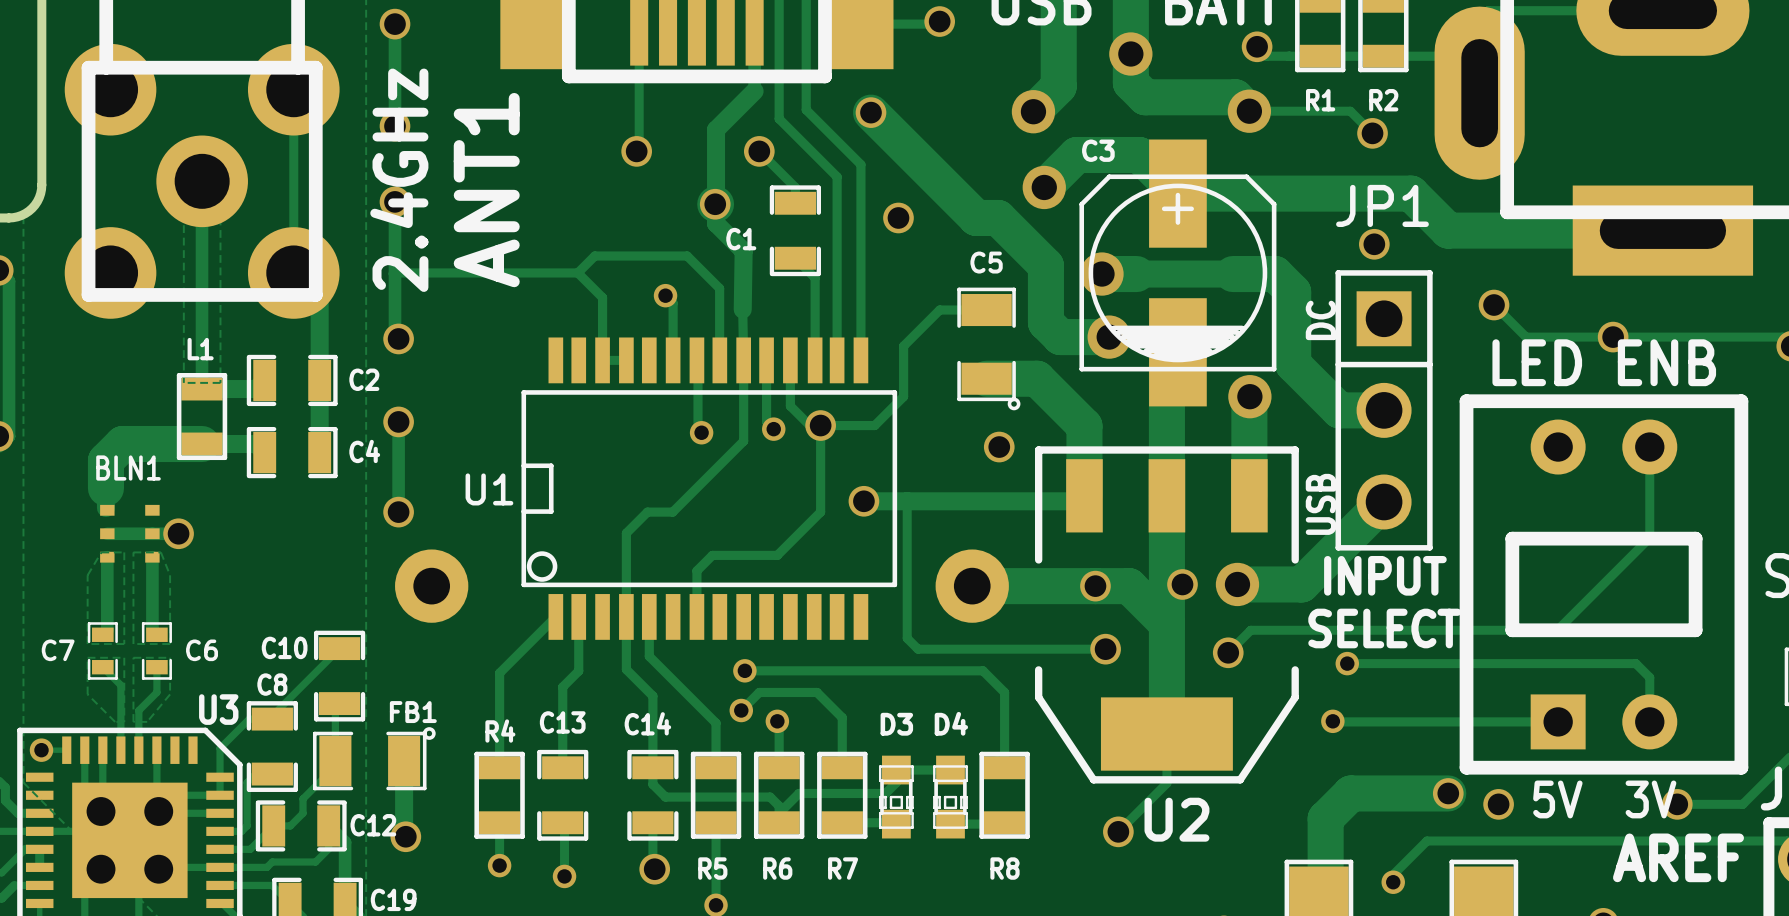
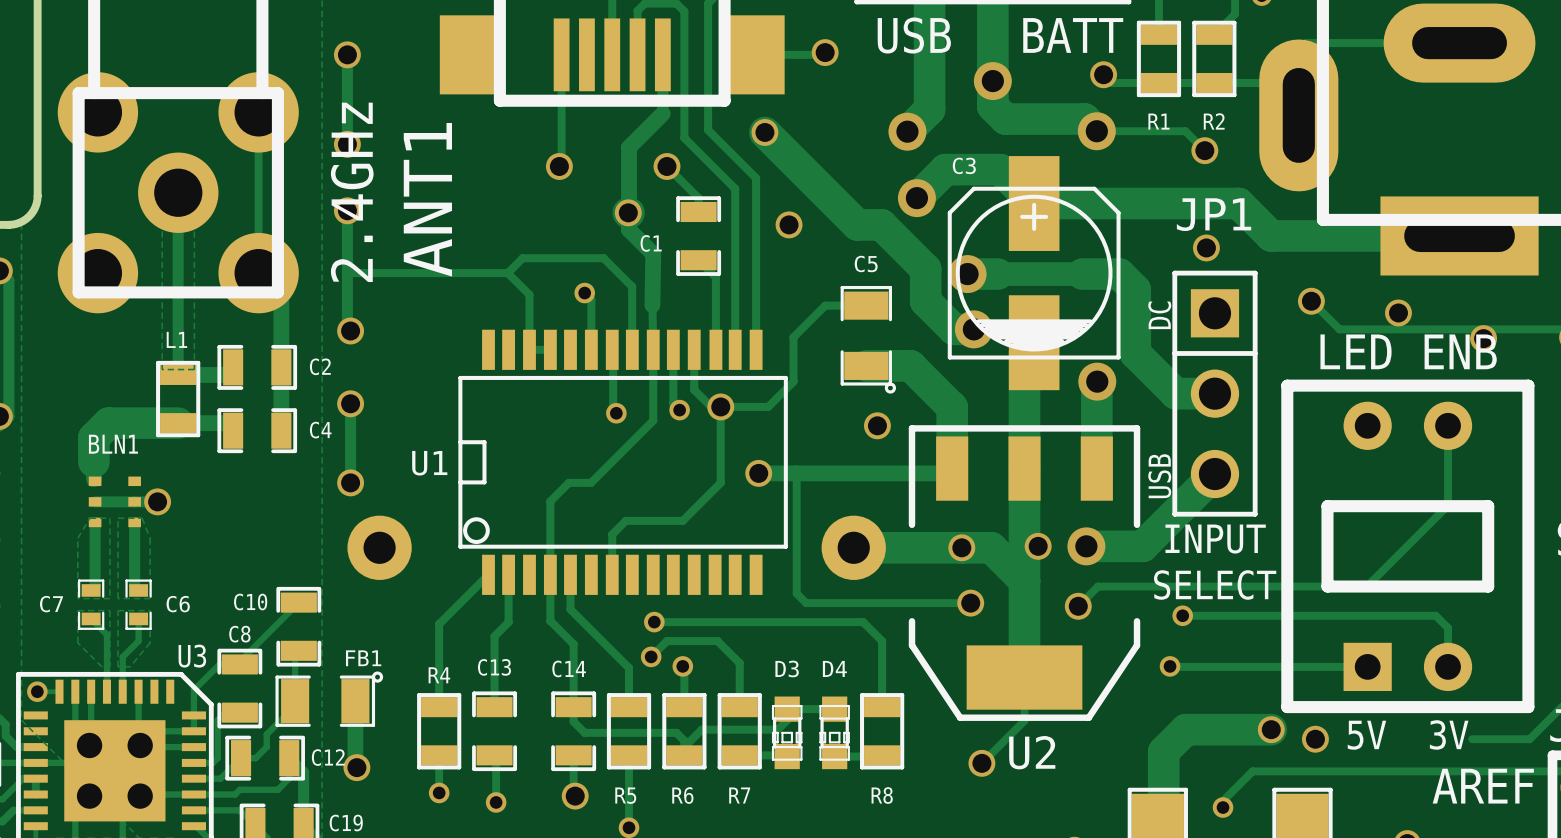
track: (998, 217) (1045, 265) (1045, 322) (1060, 337) (1086, 337) -> (876, 224) (881, 224) (925, 269) (925, 301) (953, 329)
via position: (1613, 337) -> (1398, 312)
via: none -> (1483, 338)
via: (1677, 804) -> none

